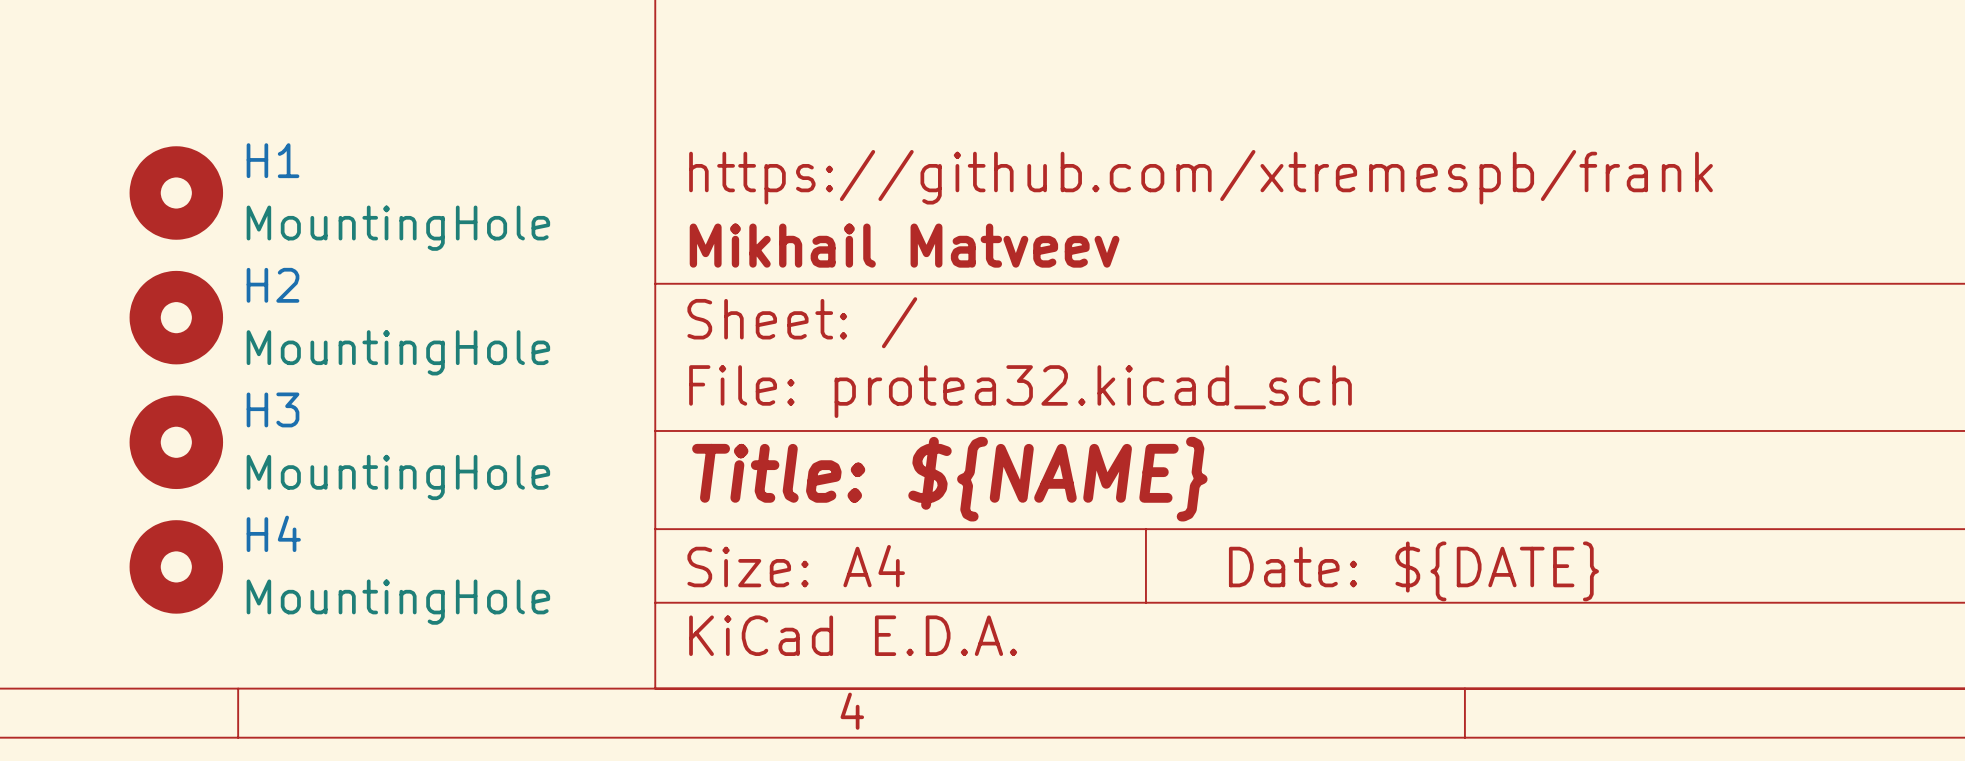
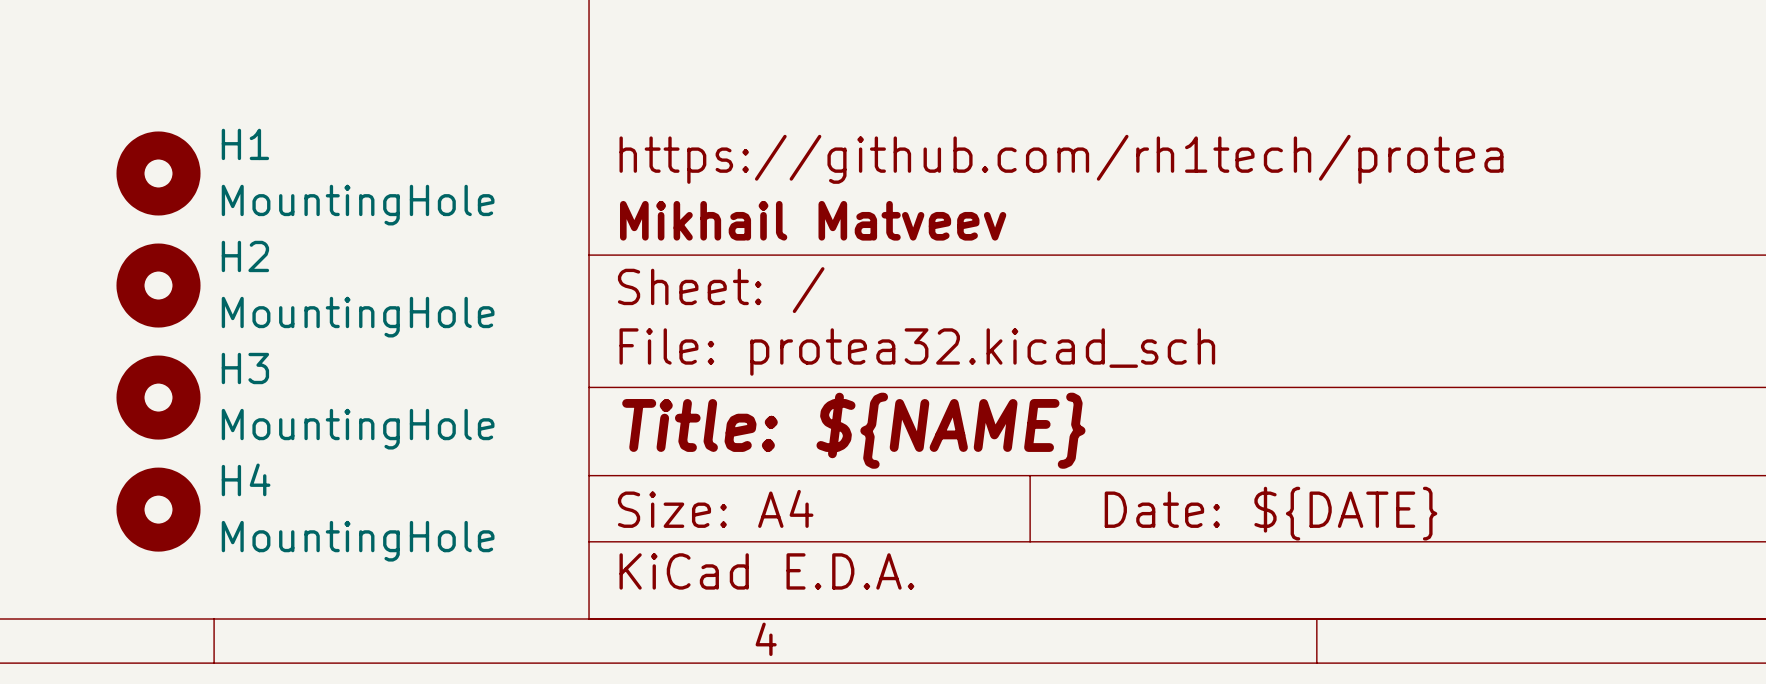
title block: https://github.com/xtremespb/frank (1201, 177) -> https://github.com/rh1tech/protea (1061, 159)

